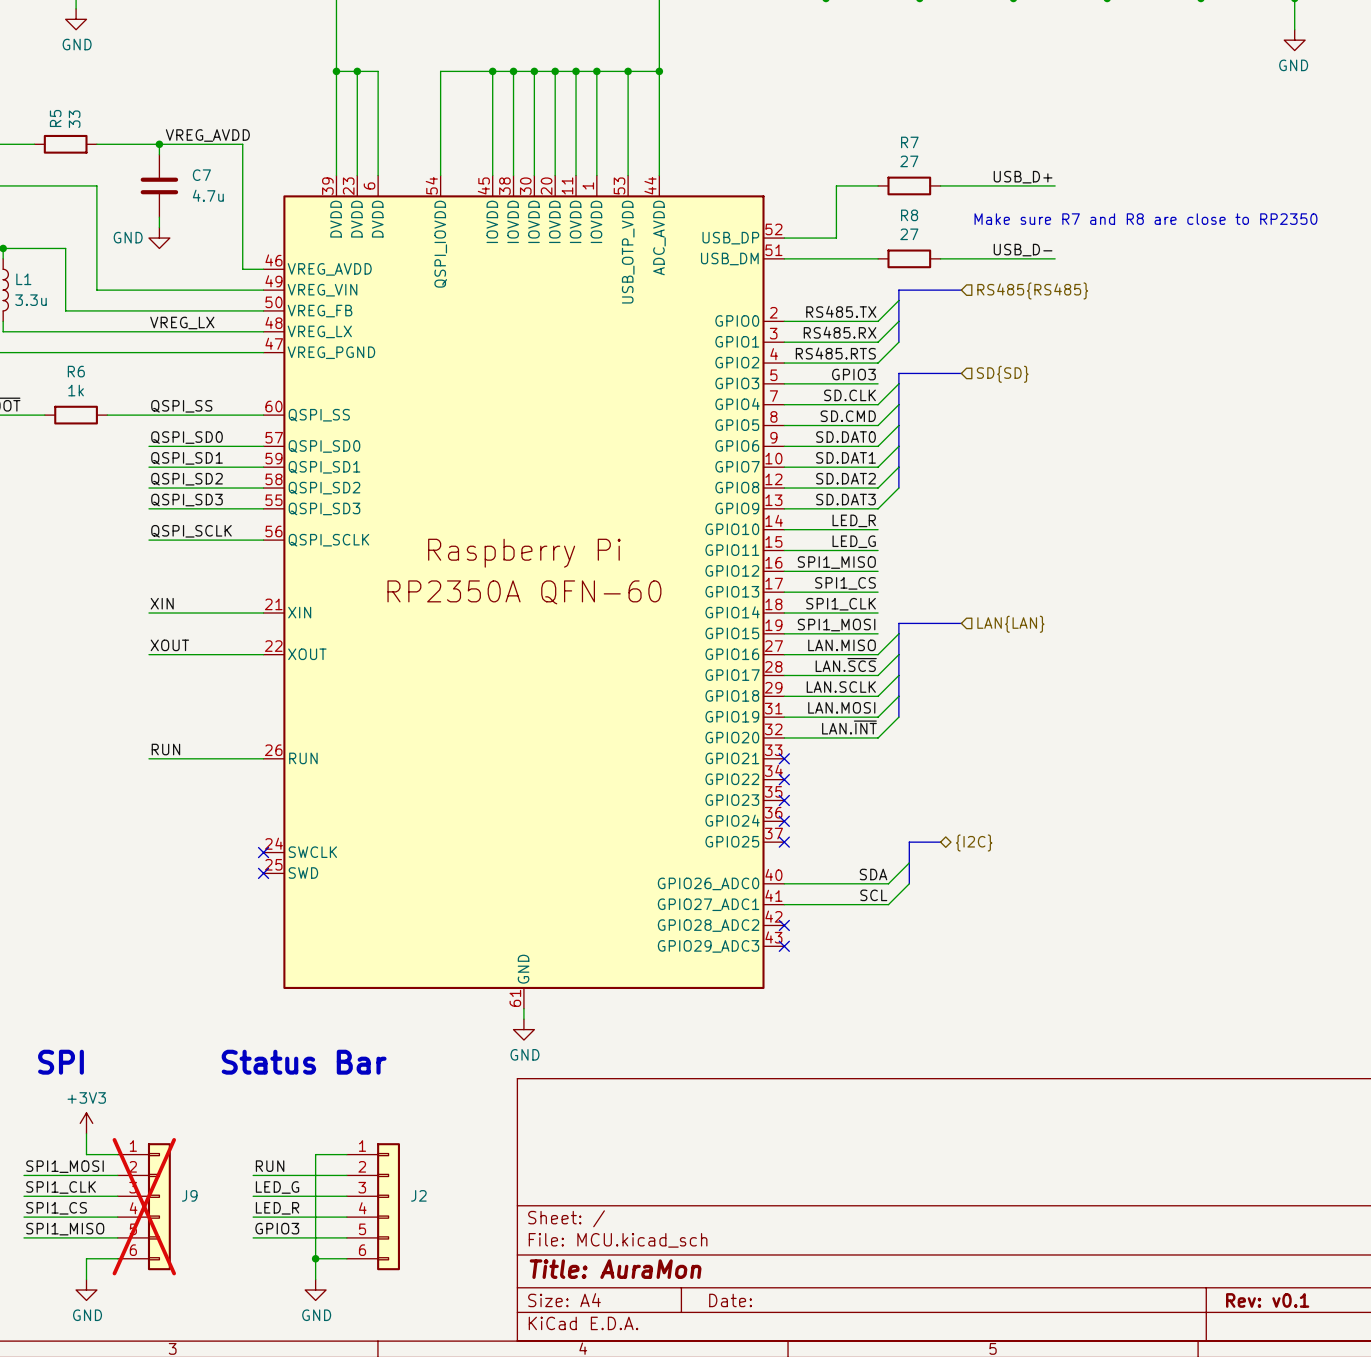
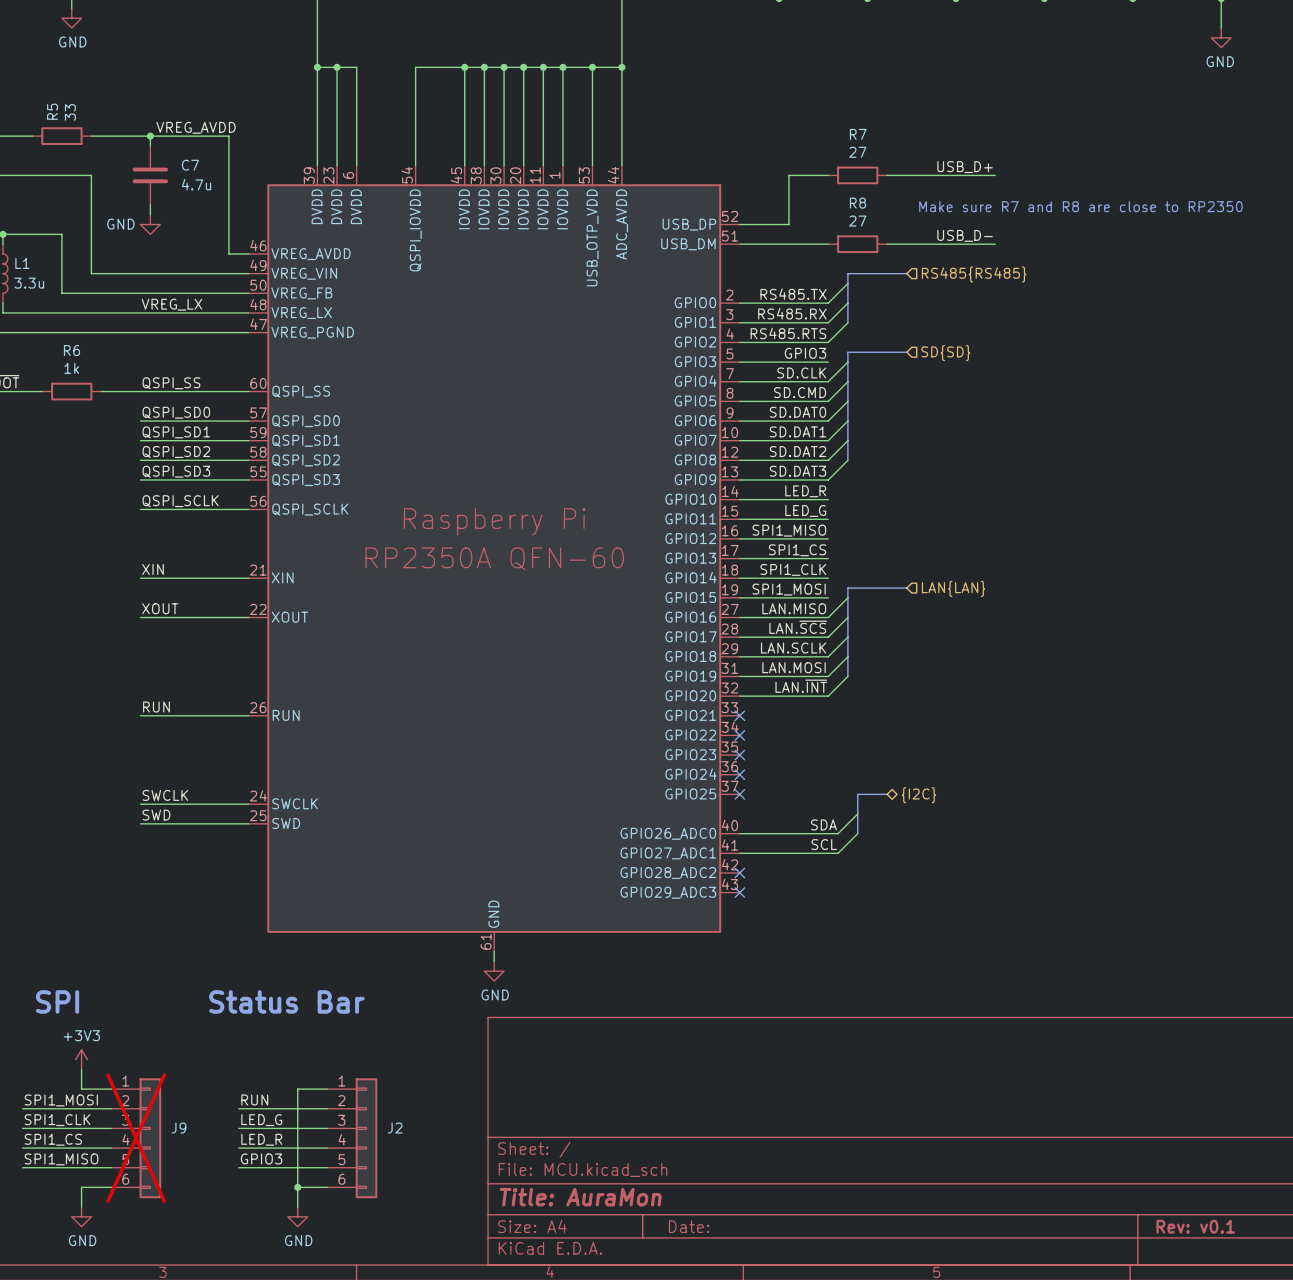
label: none -> SWCLK (165, 795)
wire: none -> (140, 804) (248, 804)
no-connect mark: (263, 852) -> none
label: none -> SWD (156, 815)
wire: none -> (140, 823) (248, 823)
no-connect mark: (263, 873) -> none

